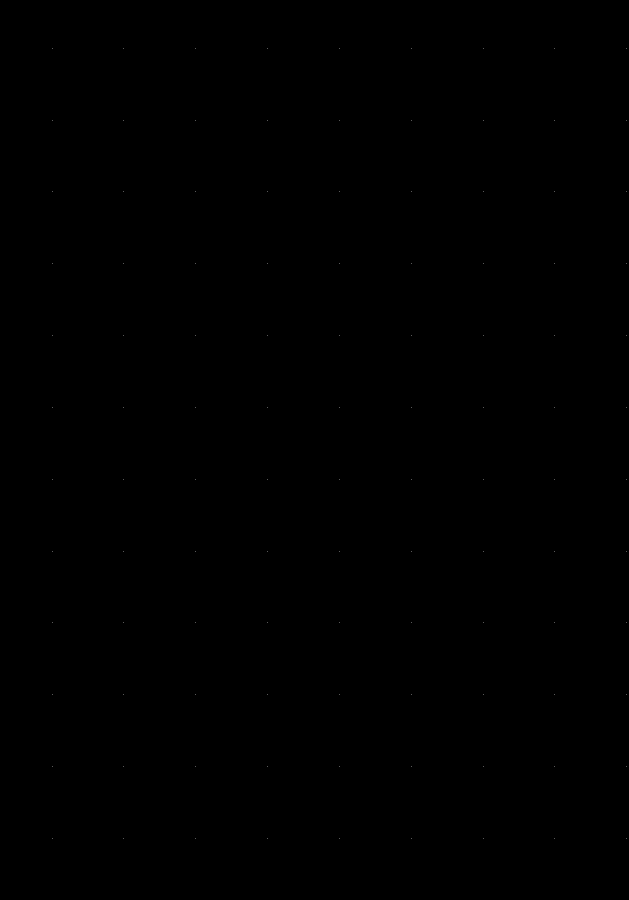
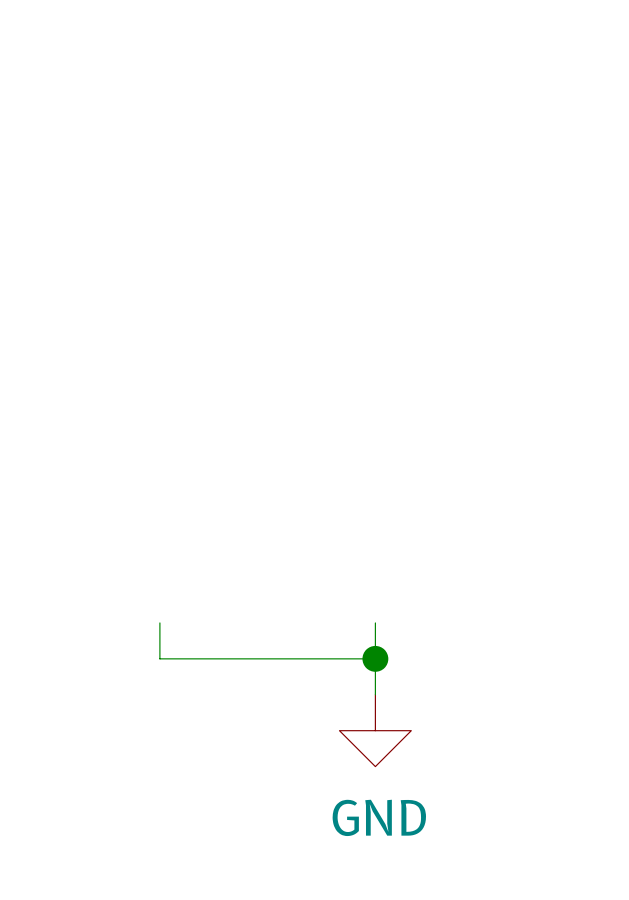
wire: none -> (159, 622) (159, 658) (375, 658)
wire: none -> (375, 622) (375, 694)
junction: none -> (375, 658)
power symbol: none -> GND (375, 730)

